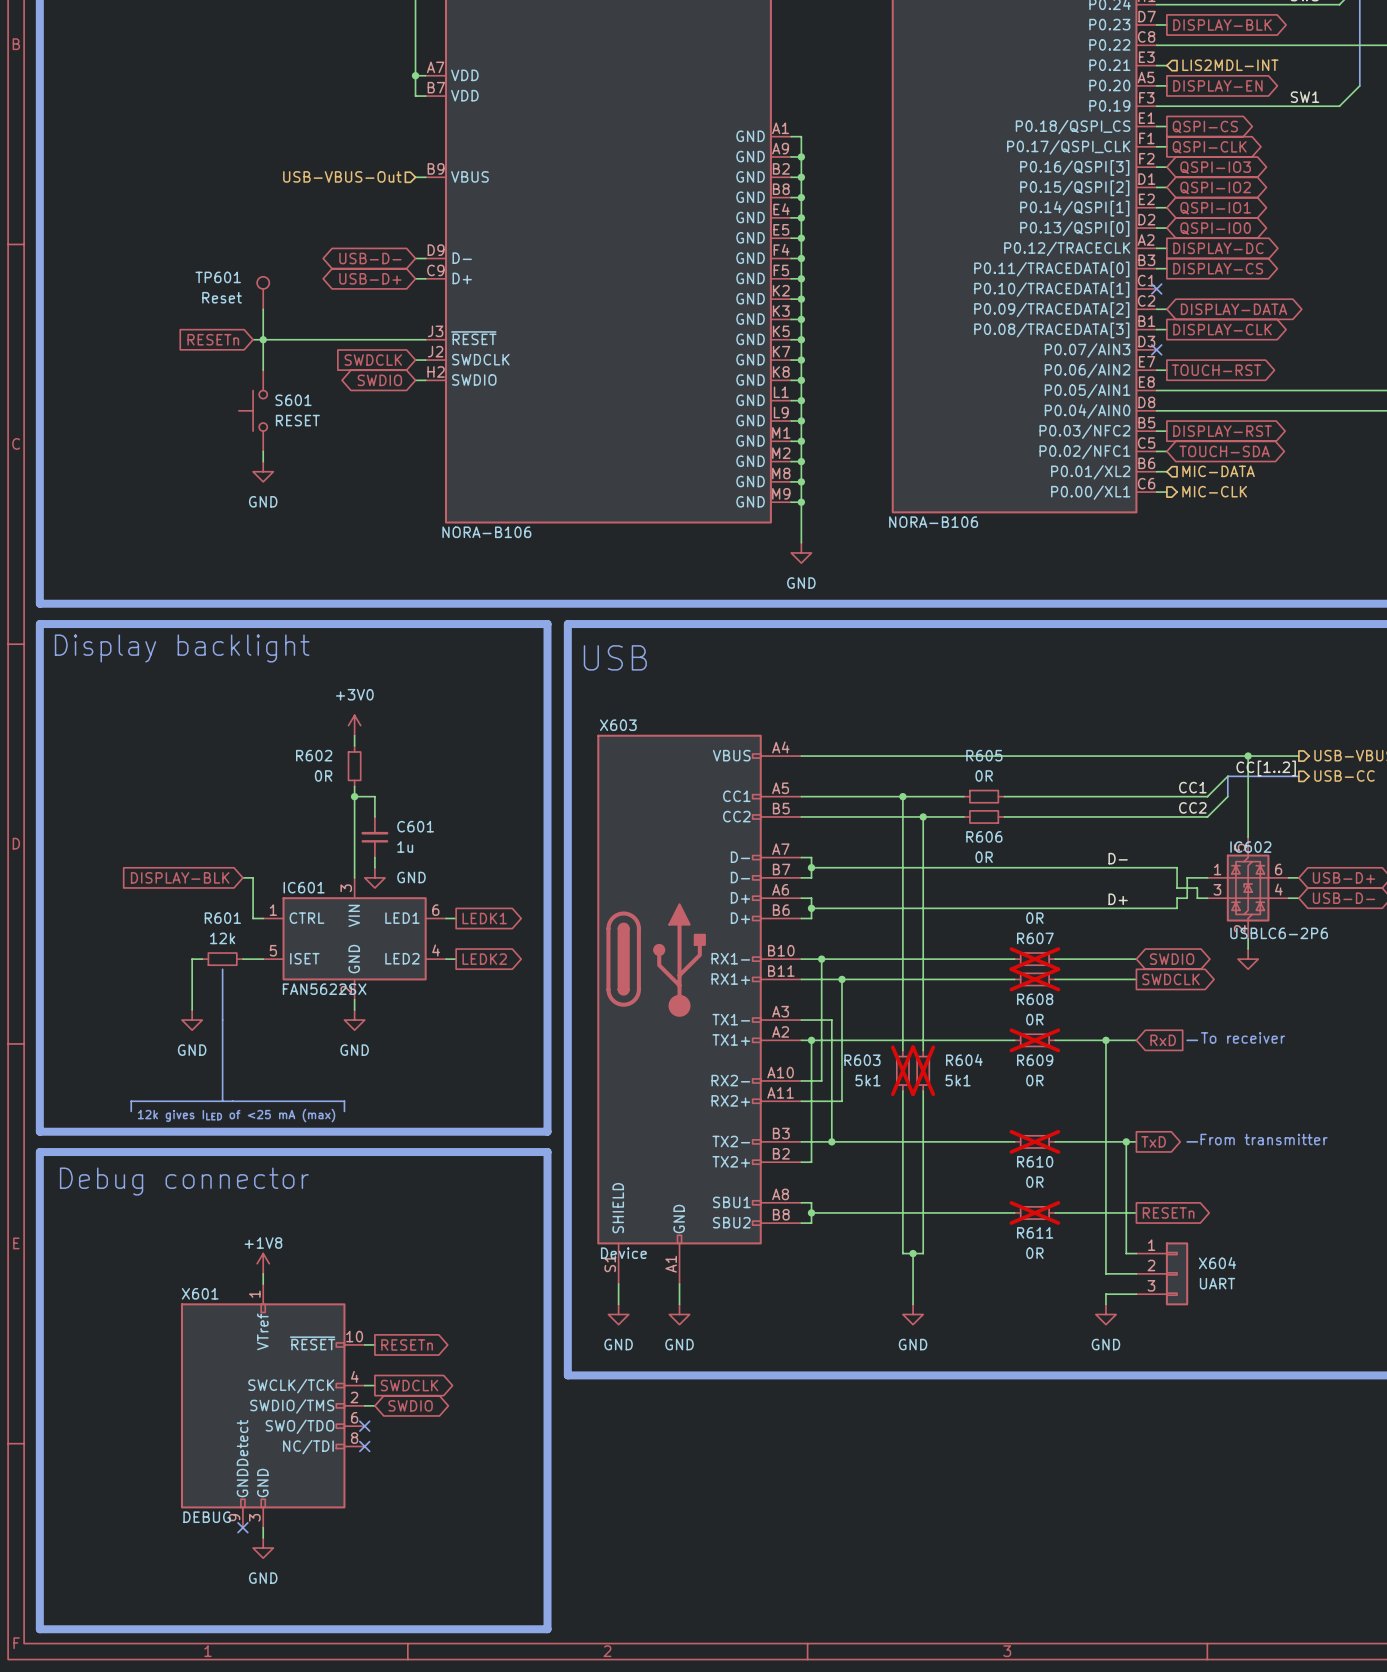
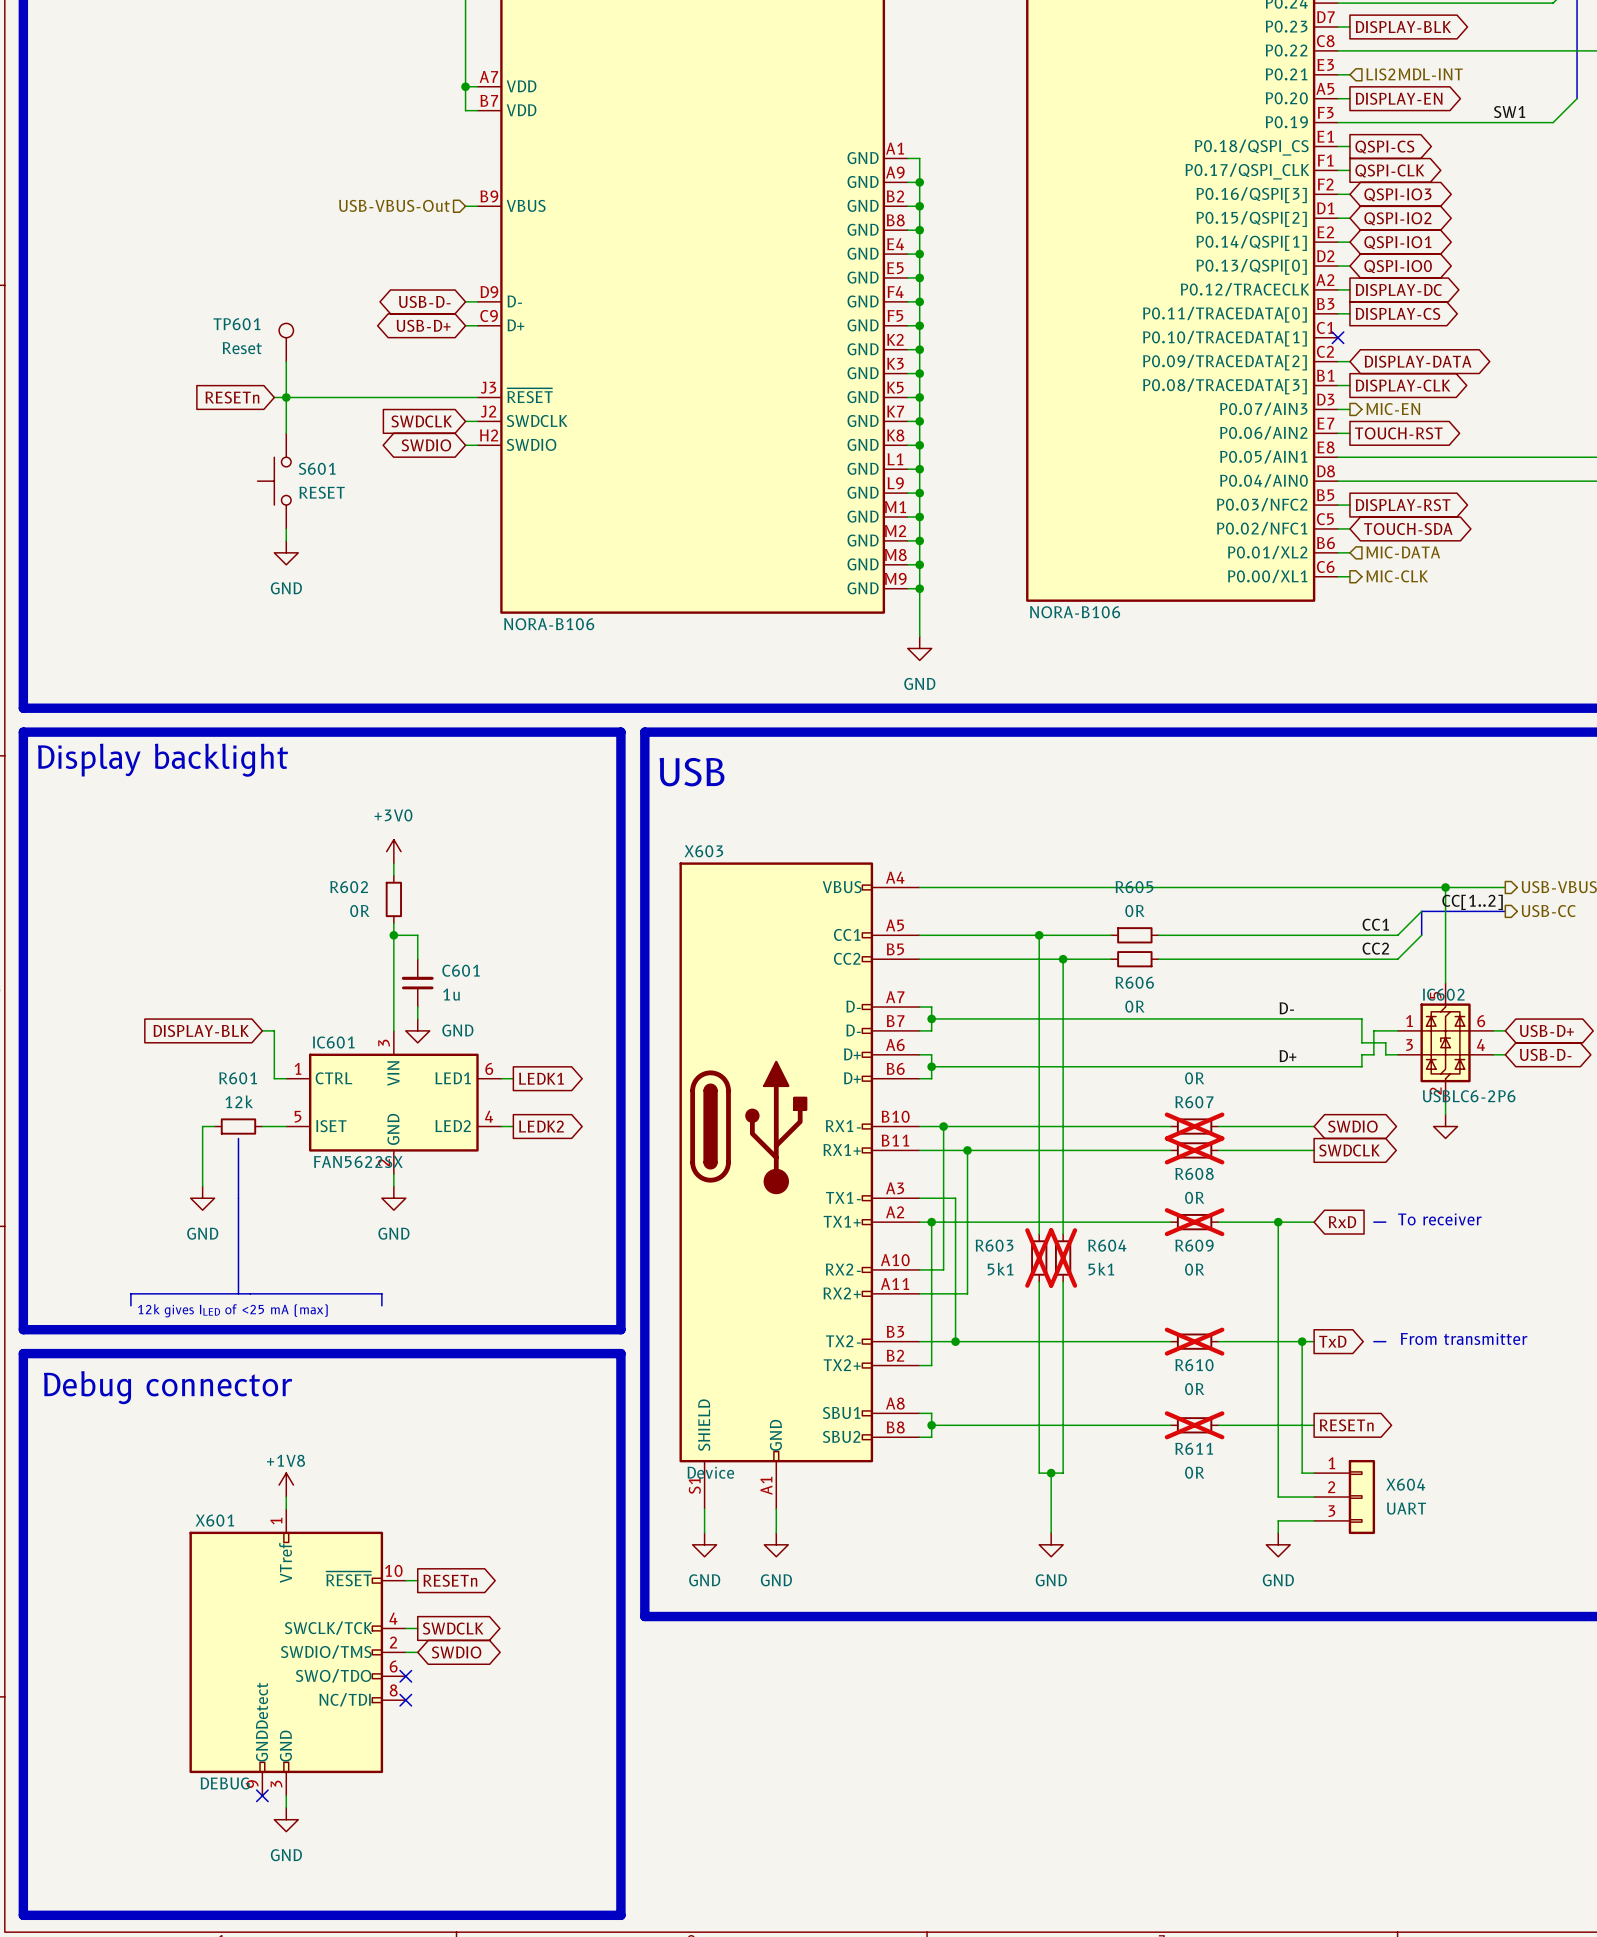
wire: none -> (1338, 409) (1349, 409)
no-connect mark: (1156, 349) -> none
hierarchical label: none -> MIC-EN (1393, 409)

